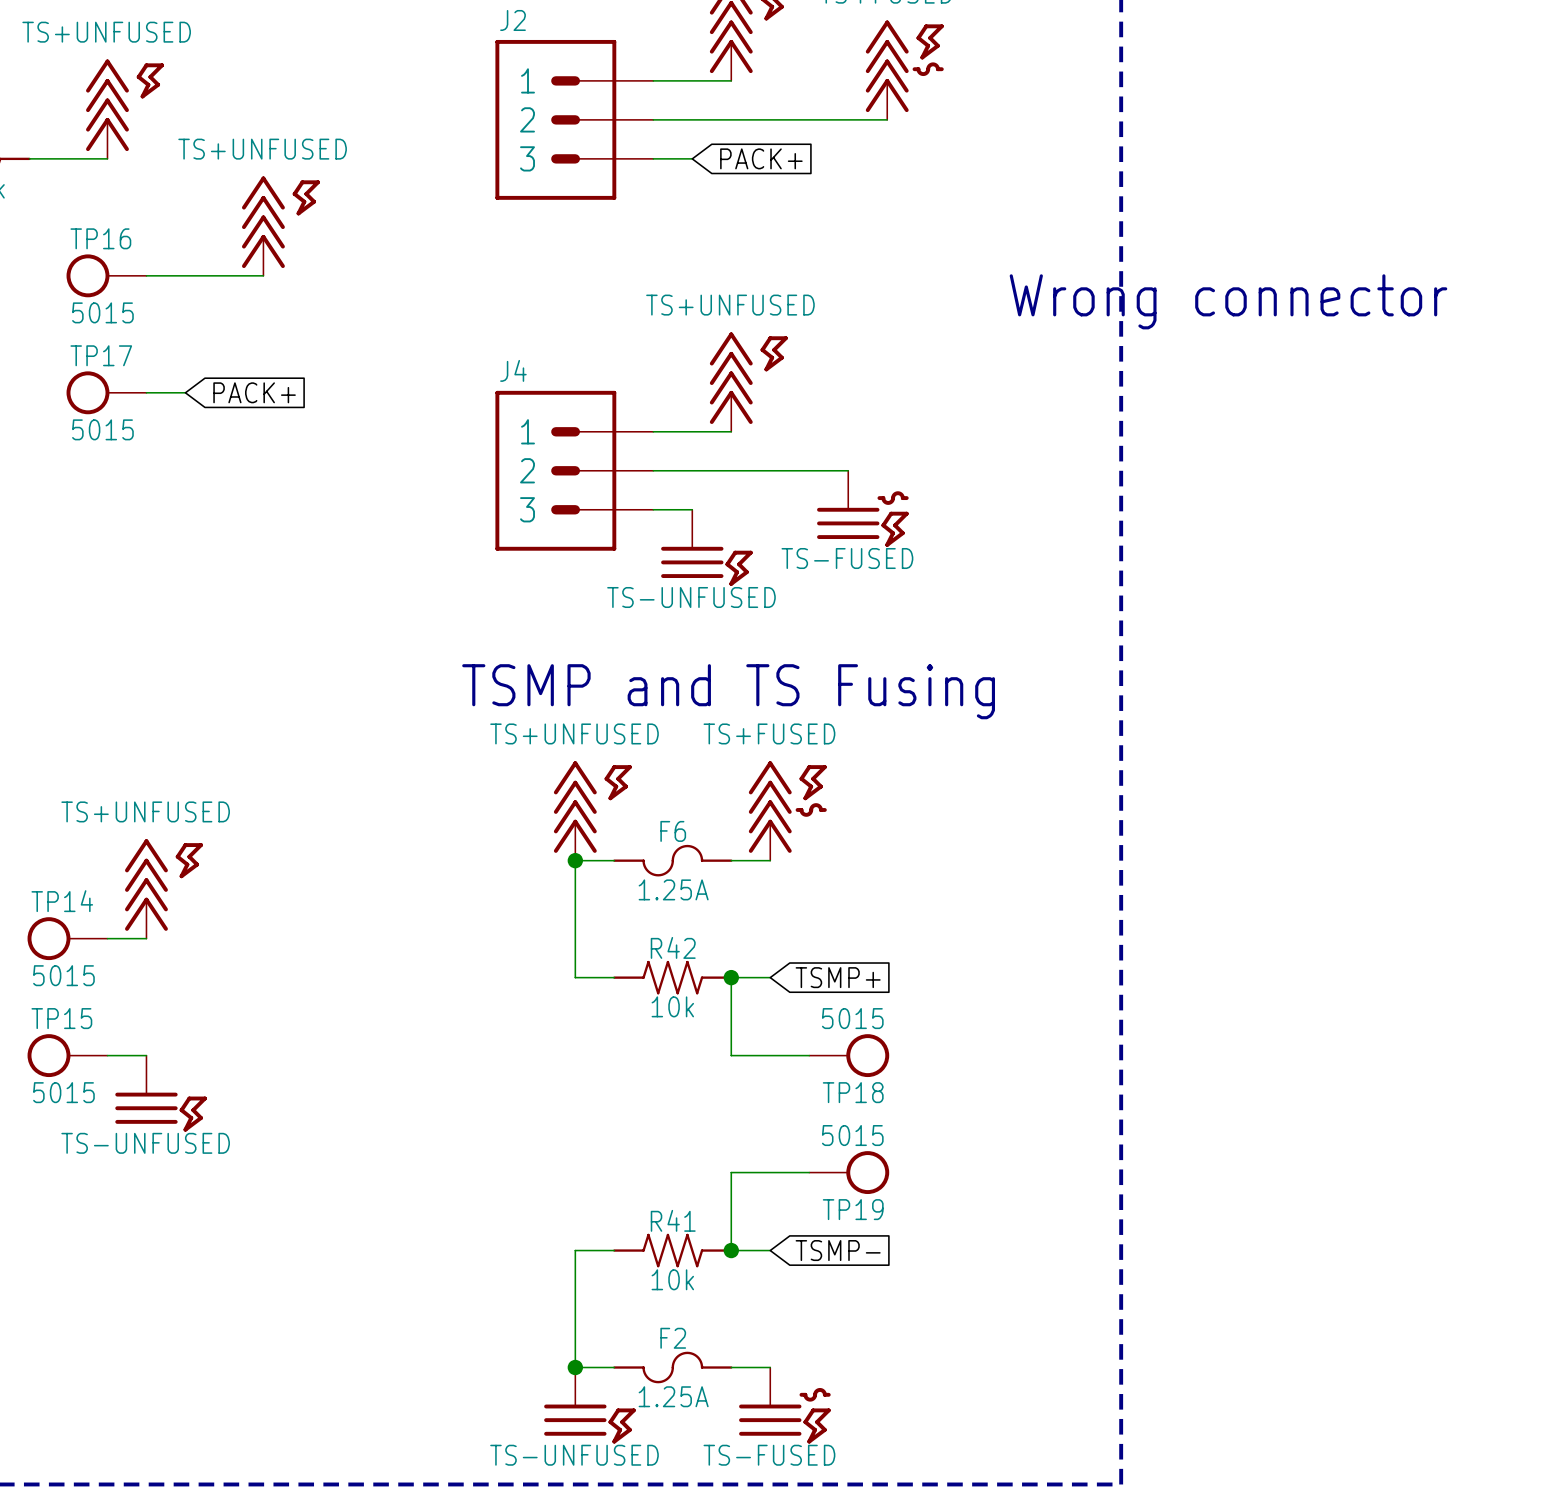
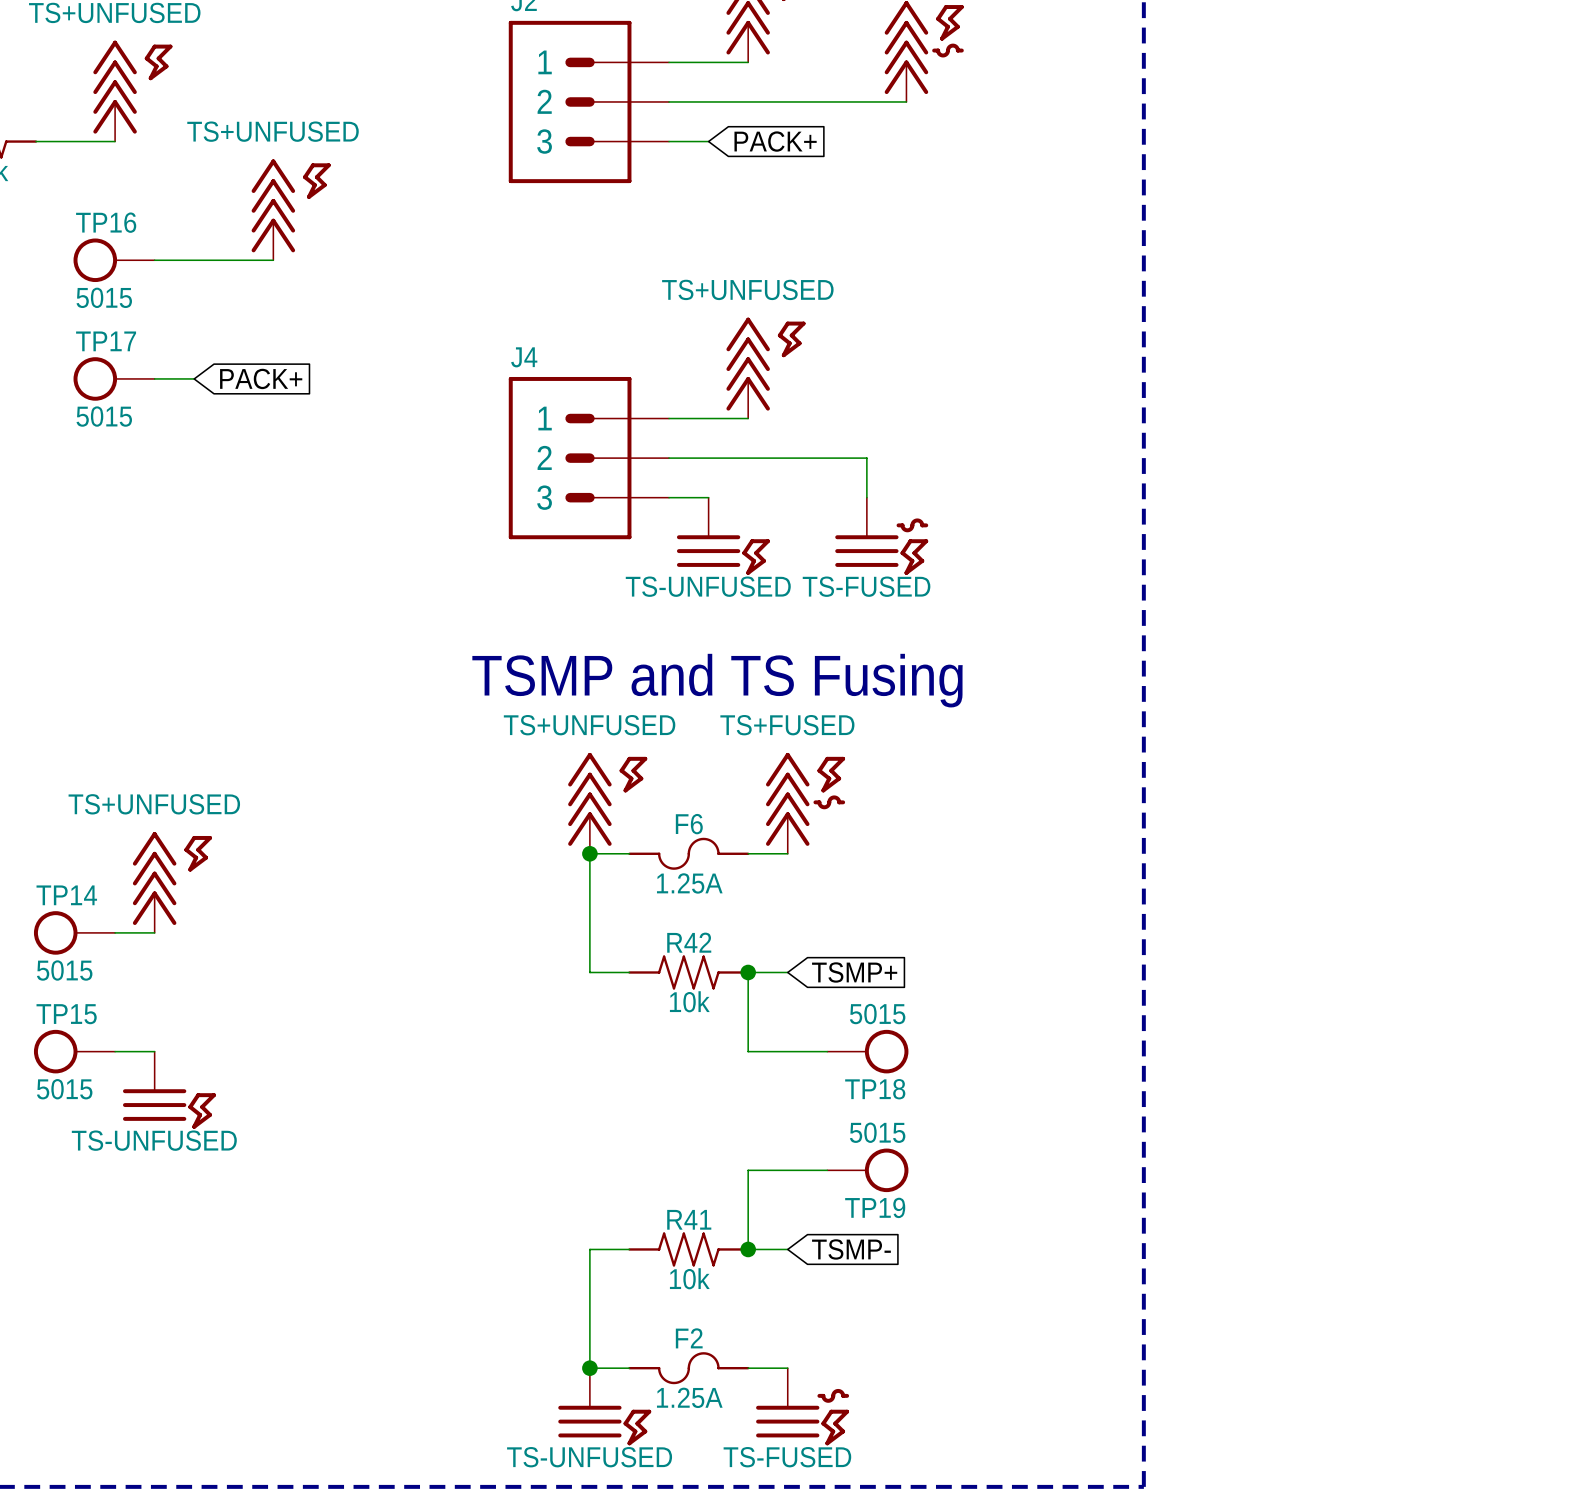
text: Wrong connector (1228, 301) -> none
power symbol position: TS-FUSED (862, 508) -> TS-FUSED (881, 536)

